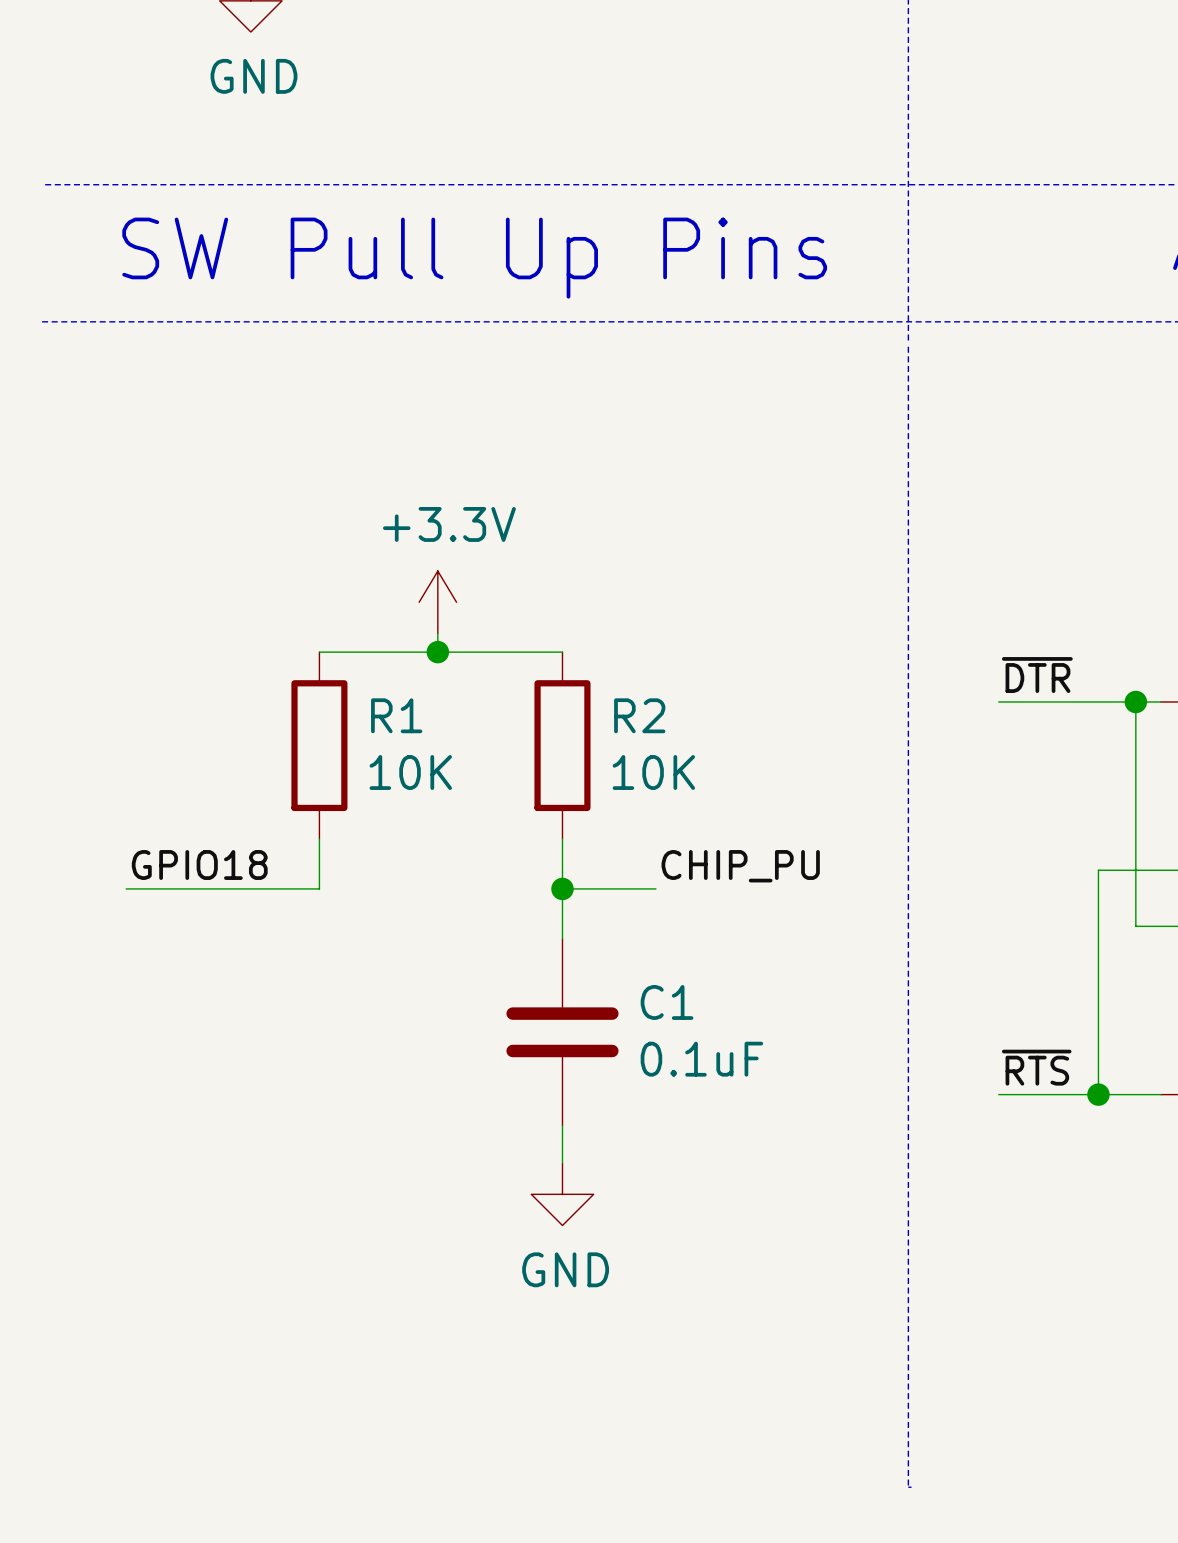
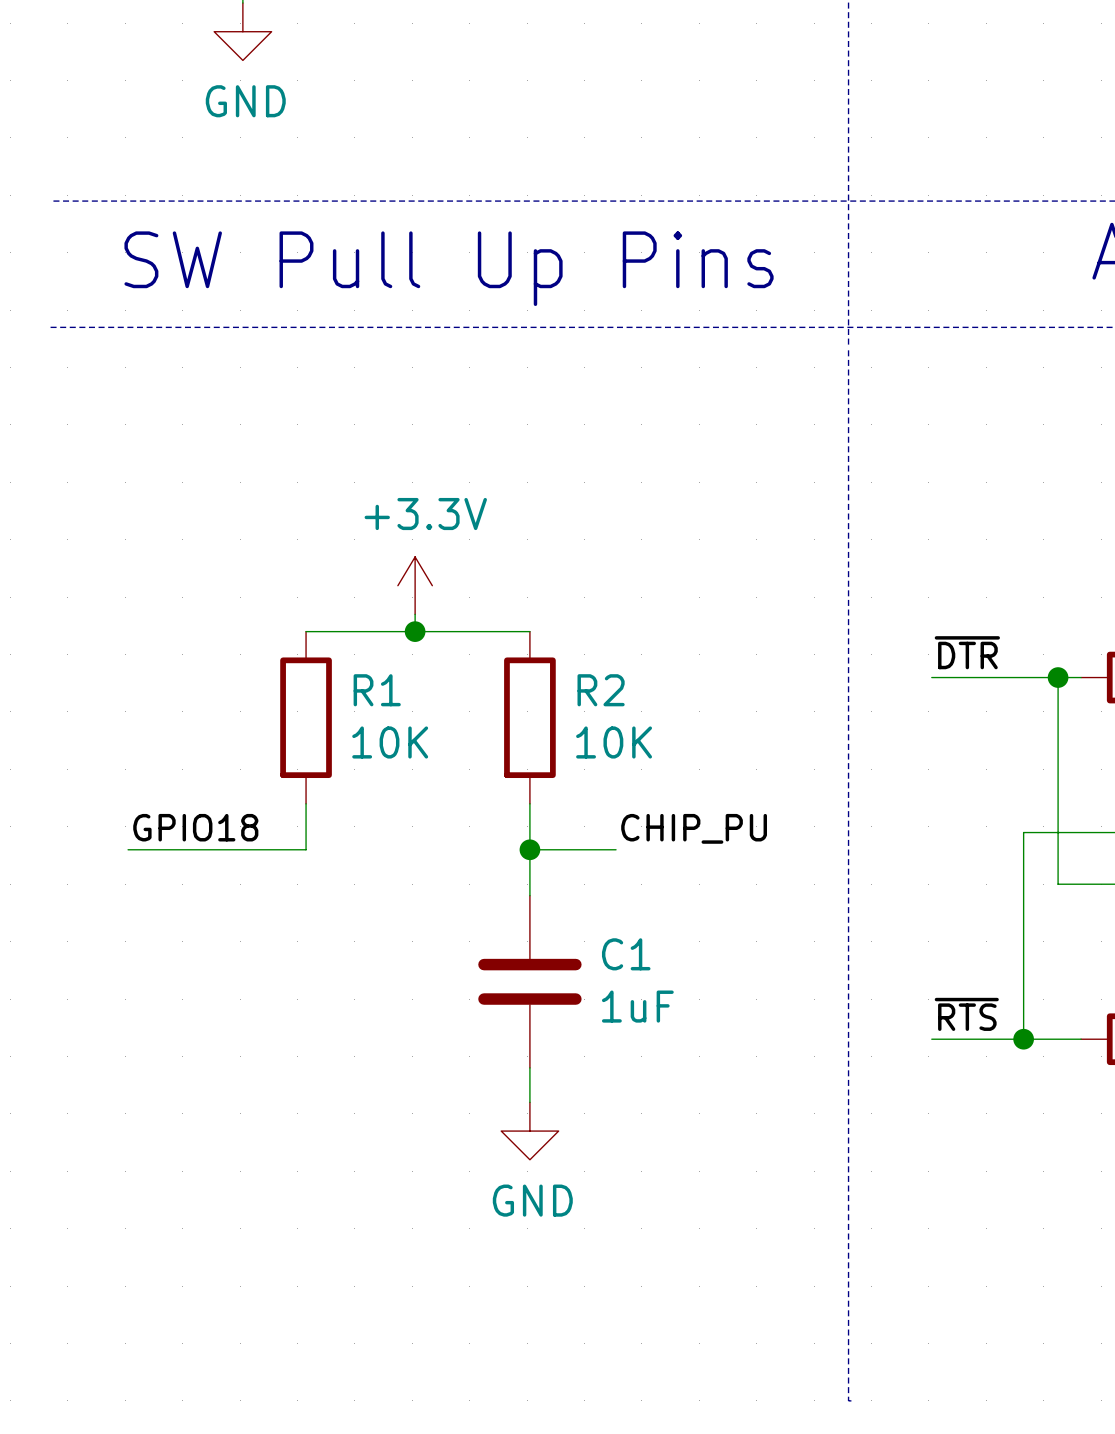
C1 value: 0.1uF (701, 1059) -> 1uF (637, 1006)

